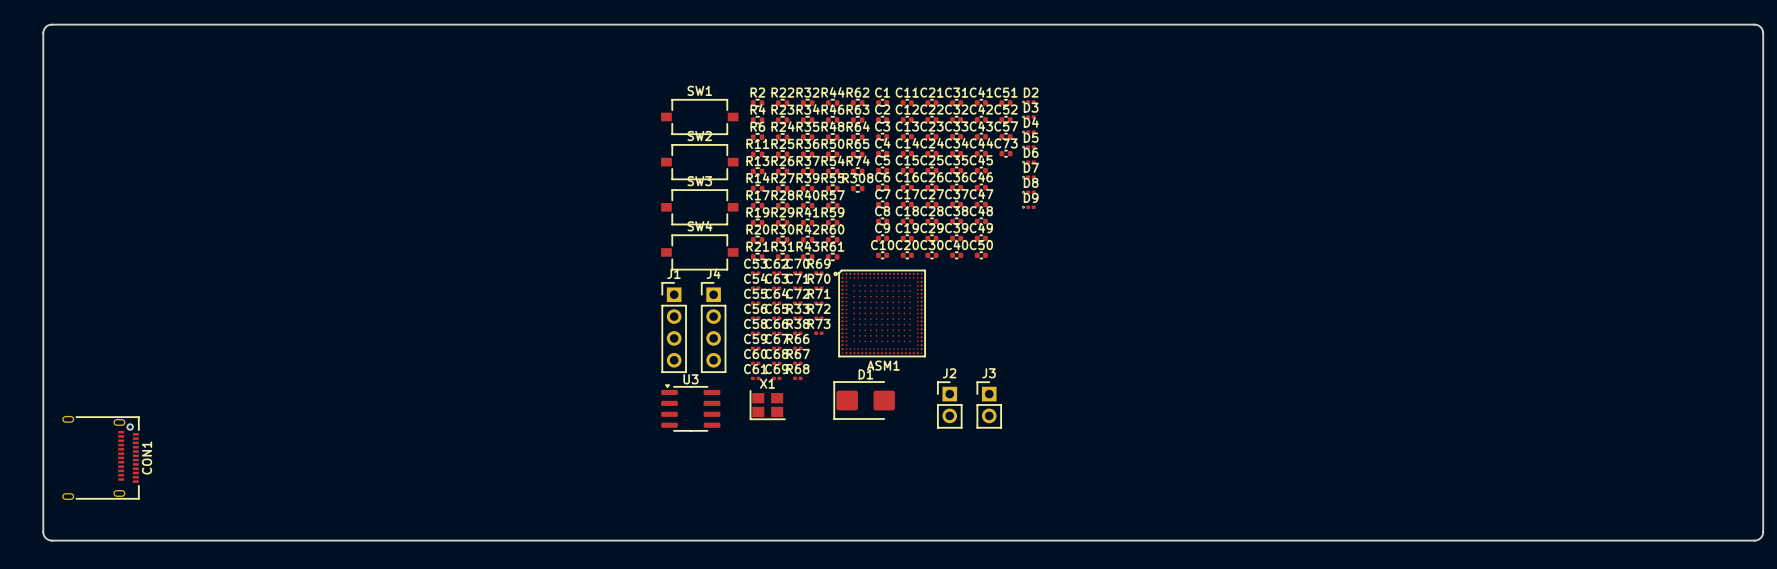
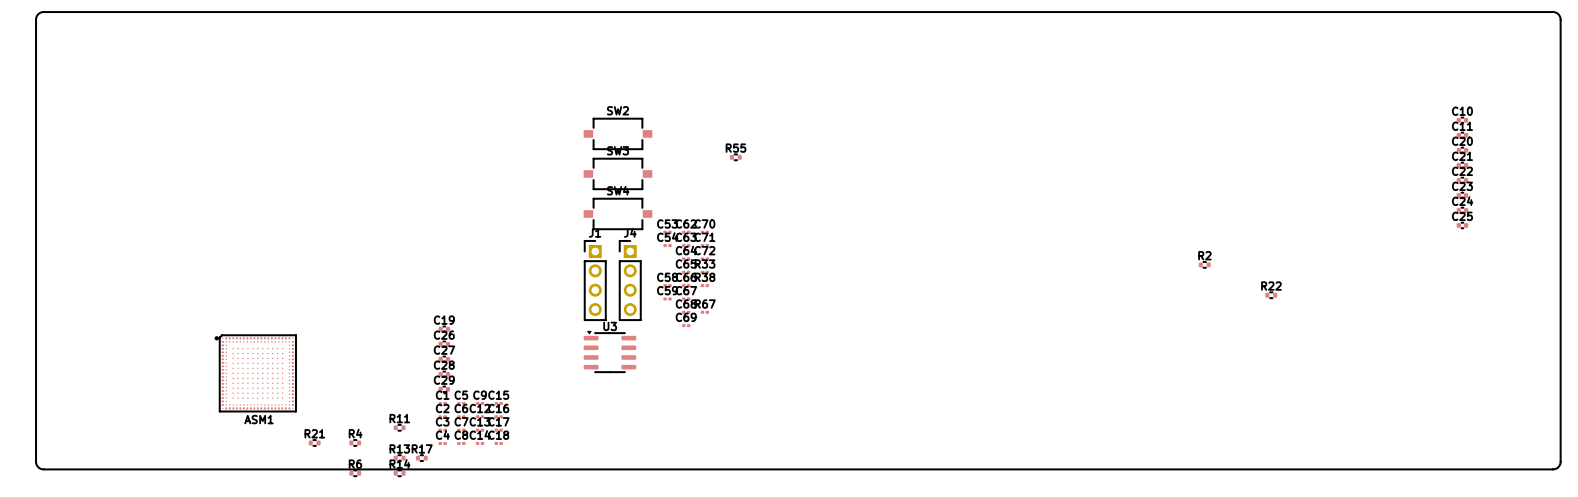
C1 footprint: [876, 99, 890, 107] -> [438, 401, 447, 406]
D2: (1029, 101) -> none
R2 position: (757, 102) -> (1204, 264)
R22 position: (782, 102) -> (1271, 295)
R32: (807, 102) -> none
R44: (832, 102) -> none
R62: (857, 102) -> none
C11 position: (907, 102) -> (1462, 135)
C21 position: (931, 102) -> (1462, 165)
C31: (956, 102) -> none
C41: (981, 102) -> none
C51: (1006, 102) -> none
SW1: (699, 116) -> none
C2 footprint: [876, 116, 890, 124] -> [438, 415, 447, 419]
C12 footprint: [900, 116, 914, 124] -> [475, 415, 485, 419]
D3: (1029, 116) -> none
C22 position: (931, 119) -> (1462, 180)
C32: (956, 119) -> none
C42: (981, 119) -> none
C52: (1006, 119) -> none
R4 position: (757, 120) -> (355, 442)
R23: (782, 120) -> none
R34: (807, 120) -> none
R46: (832, 120) -> none
R63: (857, 120) -> none
D4: (1029, 132) -> none
C3 footprint: [876, 133, 890, 141] -> [438, 428, 447, 432]
C13 footprint: [900, 133, 914, 141] -> [475, 428, 485, 432]
C23 position: (931, 136) -> (1462, 195)
C33: (956, 136) -> none
C43: (981, 136) -> none
C57: (1006, 136) -> none
R6 position: (757, 137) -> (355, 473)
R24: (782, 137) -> none
R35: (807, 137) -> none
R48: (832, 137) -> none
R64: (857, 137) -> none
D5: (1029, 147) -> none
C4 footprint: [876, 150, 890, 158] -> [438, 441, 447, 446]
C14 footprint: [900, 150, 914, 158] -> [475, 441, 485, 446]
C24 position: (931, 153) -> (1462, 210)
C34: (956, 153) -> none
C44: (981, 153) -> none
C73: (1006, 153) -> none
R11 position: (757, 154) -> (399, 427)
R25: (782, 154) -> none
R36: (807, 154) -> none
R50: (832, 154) -> none
R65: (857, 154) -> none
D6: (1029, 162) -> none
C5 footprint: [876, 167, 890, 175] -> [457, 401, 466, 406]
C15 footprint: [900, 167, 914, 175] -> [494, 401, 503, 406]
C25 position: (931, 170) -> (1462, 225)
C35: (956, 170) -> none
C45: (981, 170) -> none
R13 position: (757, 171) -> (399, 458)
R26: (782, 171) -> none
R37: (807, 171) -> none
R54: (832, 171) -> none
R74: (857, 171) -> none
D7: (1029, 177) -> none
C6 footprint: [876, 183, 890, 192] -> [457, 415, 466, 419]
C16 footprint: [900, 183, 914, 192] -> [494, 415, 503, 419]
C26 position: (931, 187) -> (444, 344)
C36: (956, 187) -> none
C46: (981, 187) -> none
R14 position: (757, 188) -> (399, 473)
R27: (782, 188) -> none
R39: (807, 188) -> none
R308: (857, 188) -> none
D8: (1029, 192) -> none
C7 footprint: [876, 200, 890, 209] -> [457, 428, 466, 432]
C17 footprint: [900, 200, 914, 209] -> [494, 428, 503, 432]
C27 position: (931, 204) -> (444, 359)
C37: (956, 204) -> none
C47: (981, 204) -> none
R17 position: (757, 205) -> (421, 458)
R28: (782, 205) -> none
R40: (807, 205) -> none
R57: (832, 205) -> none
D9: (1029, 207) -> none
C8 footprint: [876, 217, 890, 226] -> [457, 441, 466, 446]
C18 footprint: [900, 217, 914, 226] -> [494, 441, 503, 446]
C28 position: (931, 221) -> (444, 374)
C38: (956, 221) -> none
C48: (981, 221) -> none
R19: (757, 222) -> none
R29: (782, 222) -> none
R41: (807, 222) -> none
R59: (832, 222) -> none
C9 footprint: [876, 234, 890, 243] -> [475, 401, 485, 406]
C19 position: (907, 238) -> (444, 329)
C29 position: (931, 238) -> (444, 389)
C39: (956, 238) -> none
C49: (981, 238) -> none
R20: (757, 239) -> none
R30: (782, 239) -> none
R42: (807, 239) -> none
R60: (832, 239) -> none
C10 position: (882, 255) -> (1462, 120)
C20 position: (907, 255) -> (1462, 150)
C30: (931, 255) -> none
C40: (956, 255) -> none
C50: (981, 255) -> none
R21 position: (757, 256) -> (314, 442)
R31: (782, 256) -> none
R43: (807, 256) -> none
R61: (832, 256) -> none
R69: (818, 273) -> none
R70: (818, 288) -> none
C55: (755, 303) -> none
R71: (818, 303) -> none
ASM1 position: (879, 313) -> (255, 373)
C56: (755, 318) -> none
R72: (818, 318) -> none
R73: (818, 333) -> none
R66: (797, 348) -> none
C60: (755, 363) -> none
C61: (755, 378) -> none
R68: (797, 378) -> none
D1: (864, 400) -> none
J2: (949, 404) -> none
J3: (989, 404) -> none
X1: (767, 405) -> none
CON1: (100, 457) -> none

